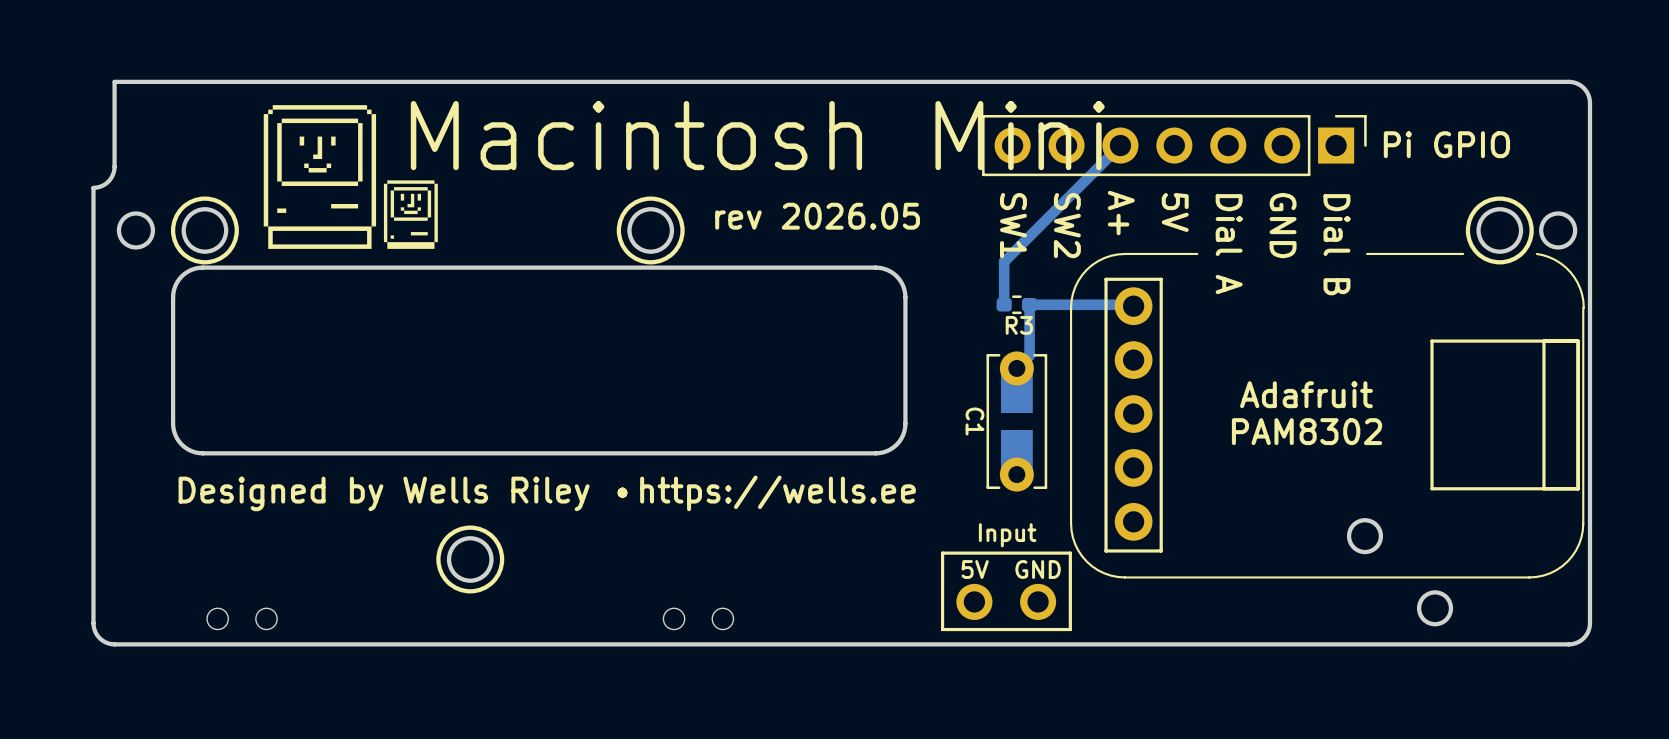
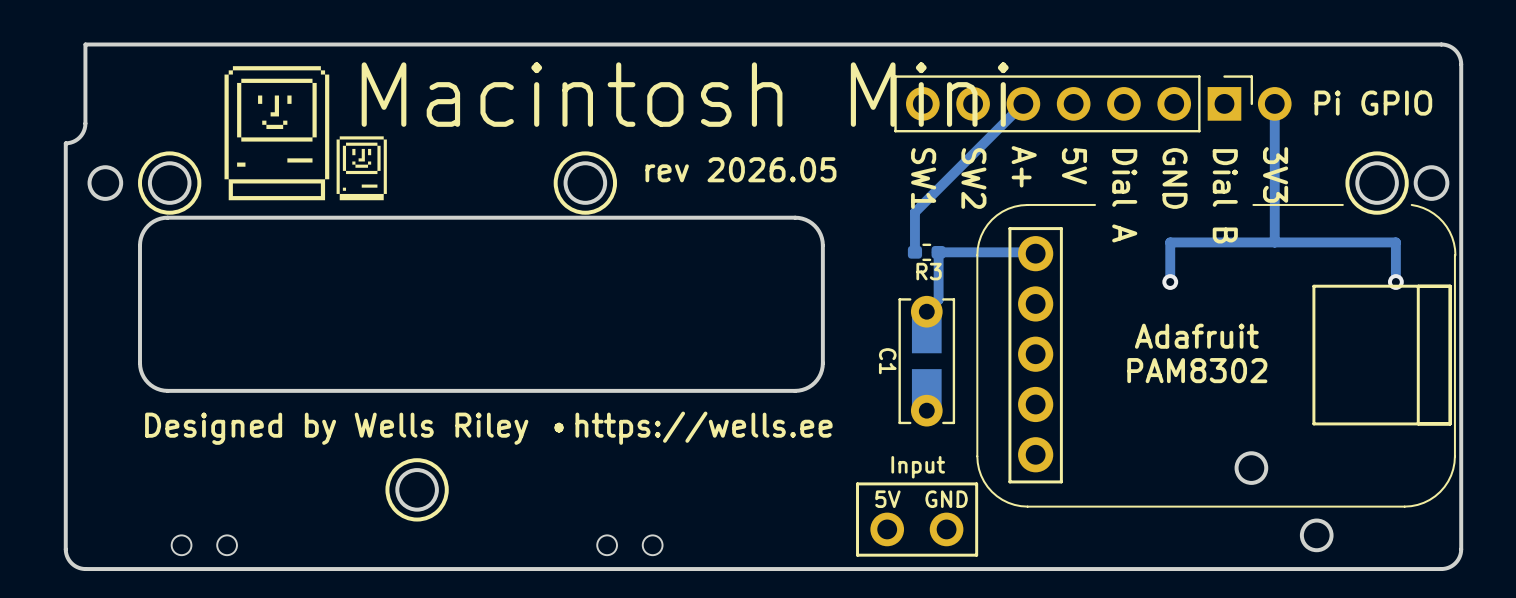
part footprint: [982, 114, 1367, 177] -> [894, 75, 1292, 133]
text position: Pi GPIO (1446, 144) -> Pi GPIO (1373, 103)
track: none -> (1274, 103) (1274, 242)
text: none -> 3V3 (1275, 174)
via: none -> (1170, 282)
track: none -> (1395, 282) (1395, 242) (1170, 242) (1170, 282)
via: none -> (1395, 282)

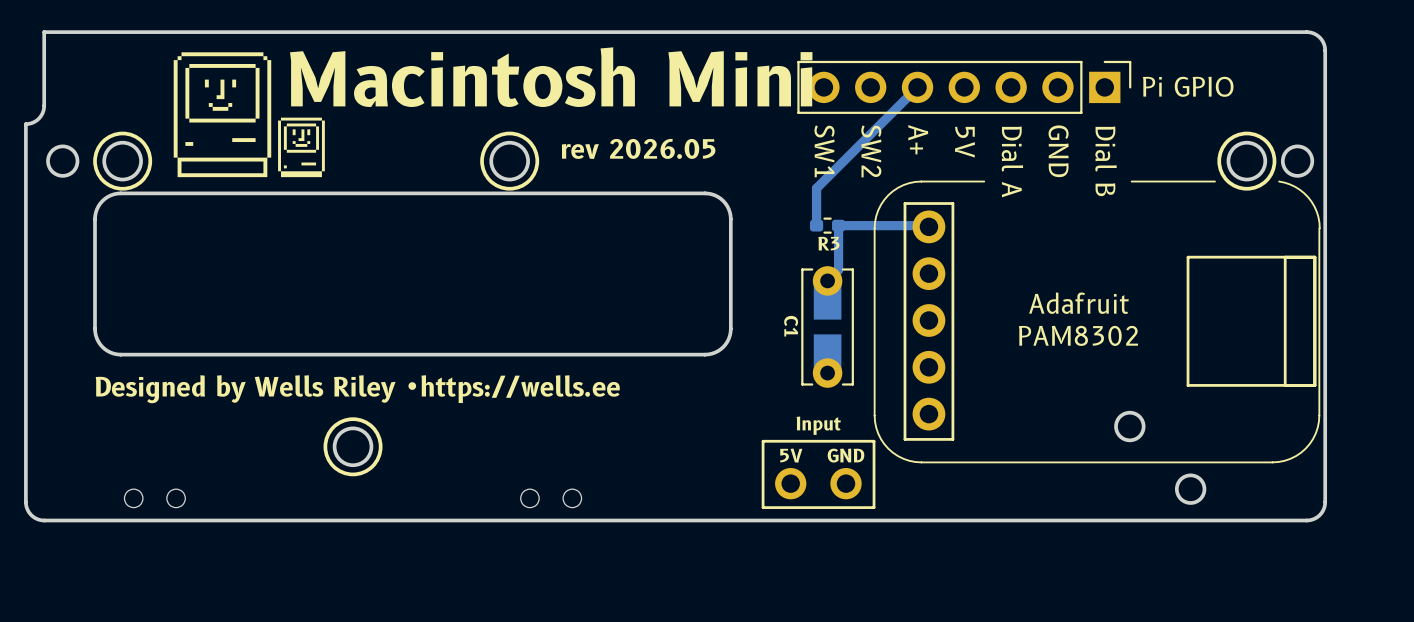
part footprint: [894, 75, 1292, 133] -> [797, 60, 1132, 114]
track: (1274, 103) (1274, 242) -> none
text position: Pi GPIO (1373, 103) -> Pi GPIO (1188, 86)
text: 3V3 (1275, 174) -> none
via: (1170, 282) -> none
track: (1395, 282) (1395, 242) (1170, 242) (1170, 282) -> none
via: (1395, 282) -> none

